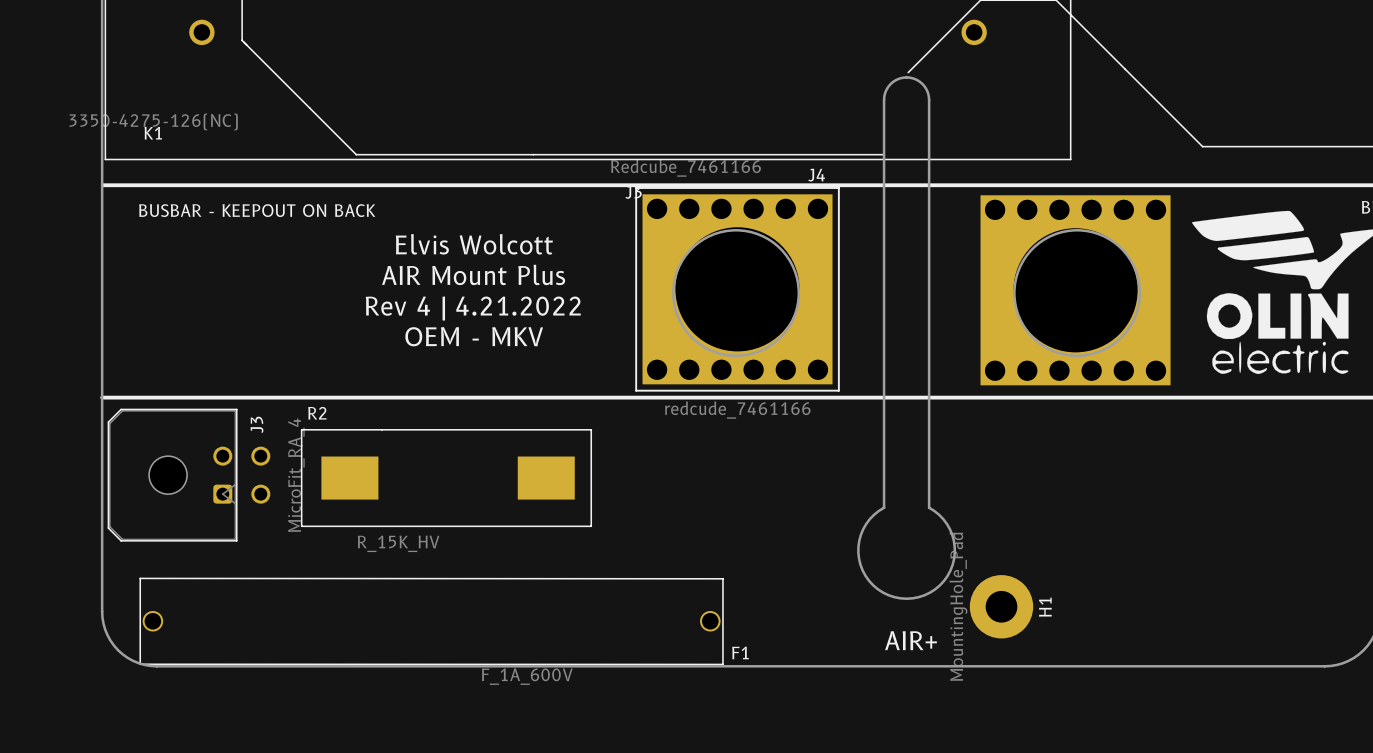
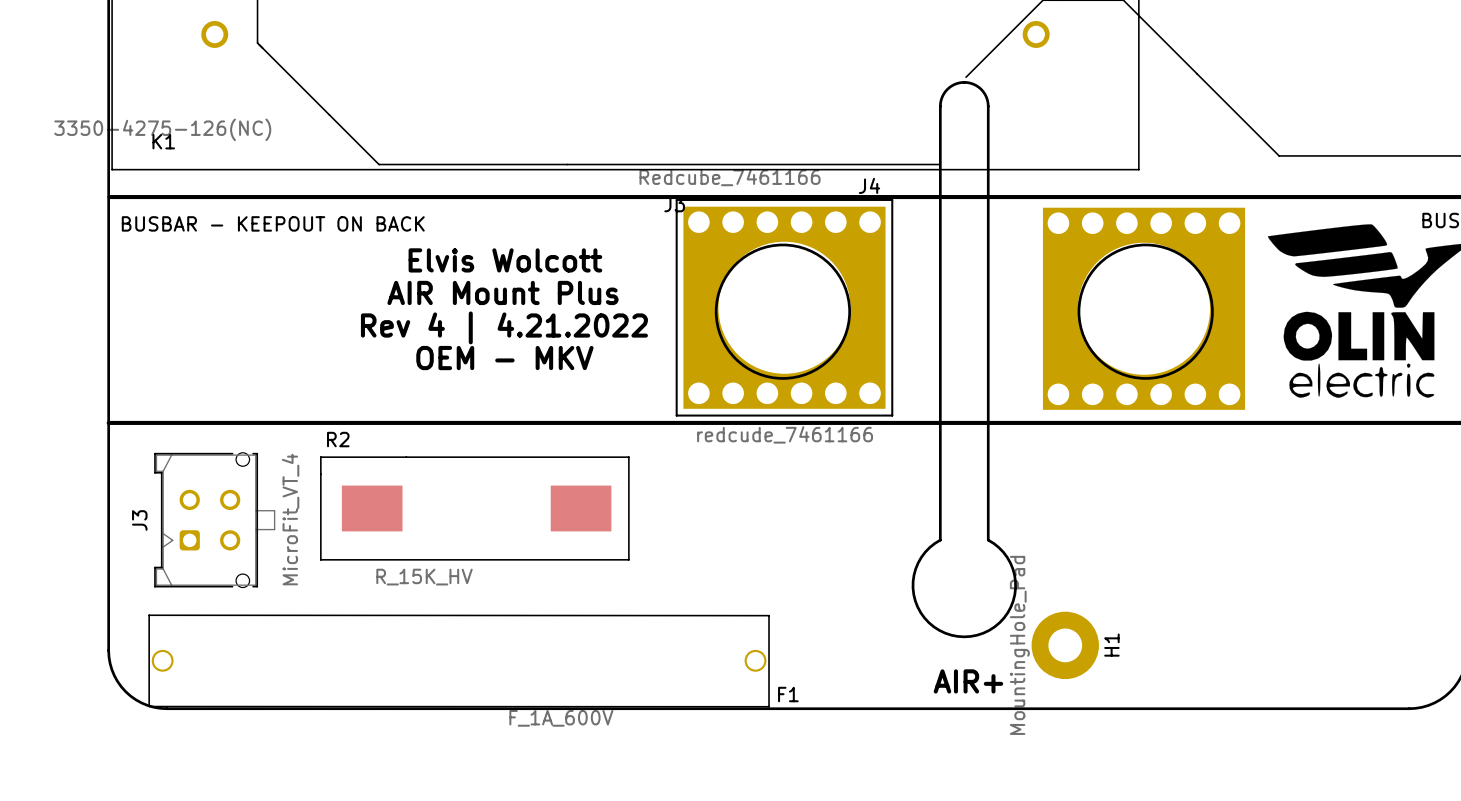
J3 footprint: [107, 408, 271, 542] -> [154, 452, 276, 588]
J3 name position: J3 (256, 424) -> J3 (139, 520)
J3 value: MicroFit_RA_4 (296, 475) -> MicroFit_VT_4 (290, 519)

